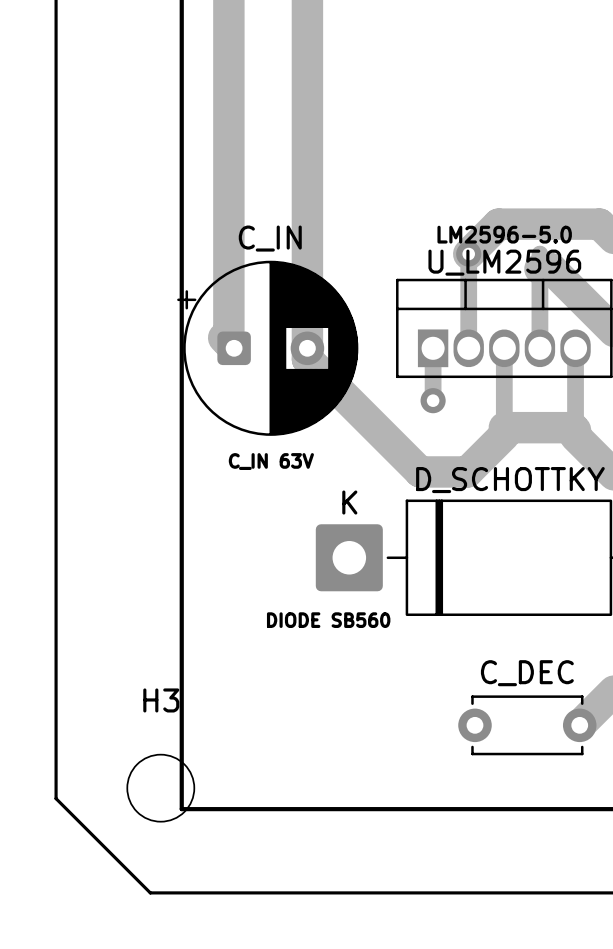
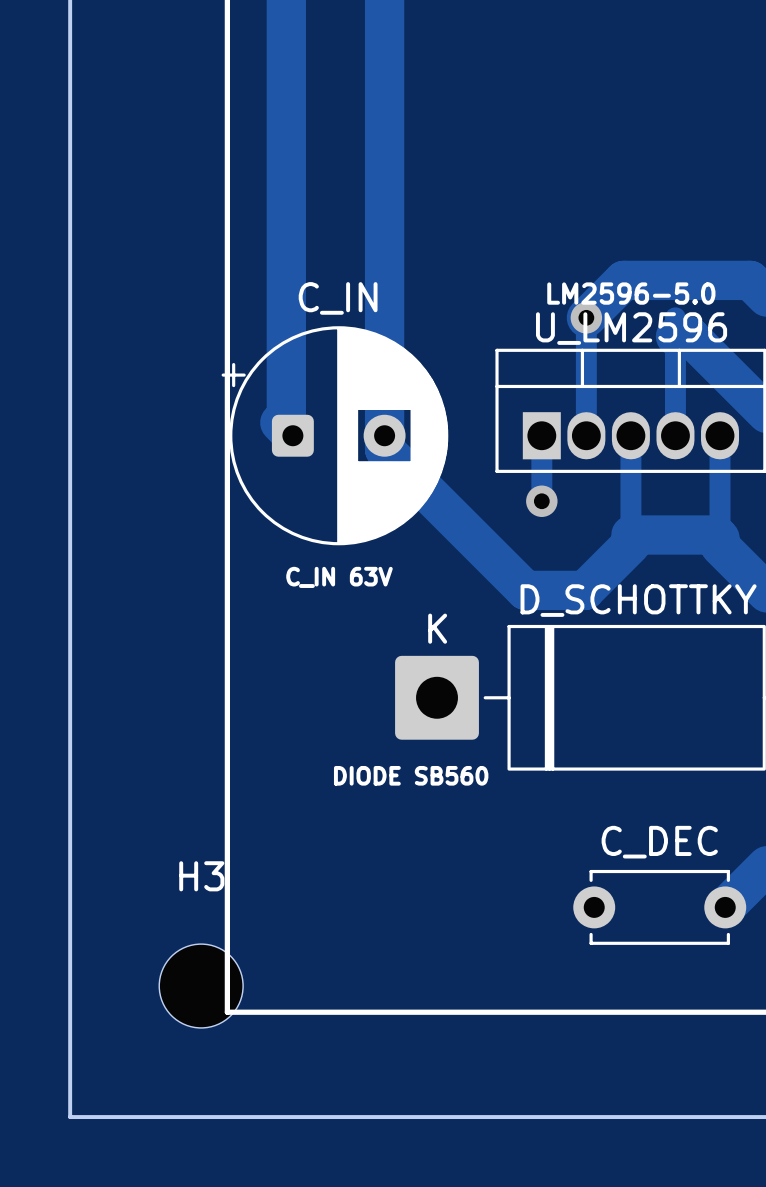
board edge: (56, 798) (150, 892) -> (70, 999) (70, 1117) (188, 1117)

